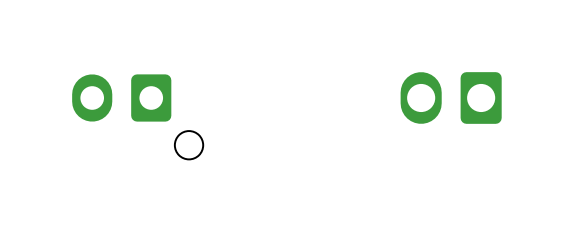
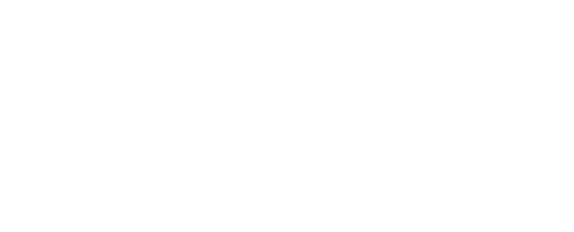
part: (451, 97) -> none
part: (137, 116) -> none

